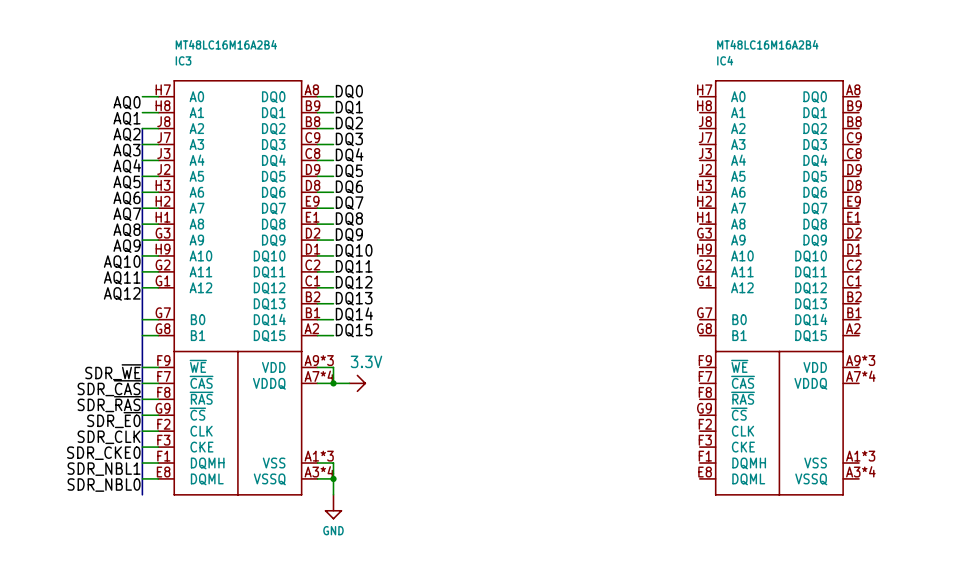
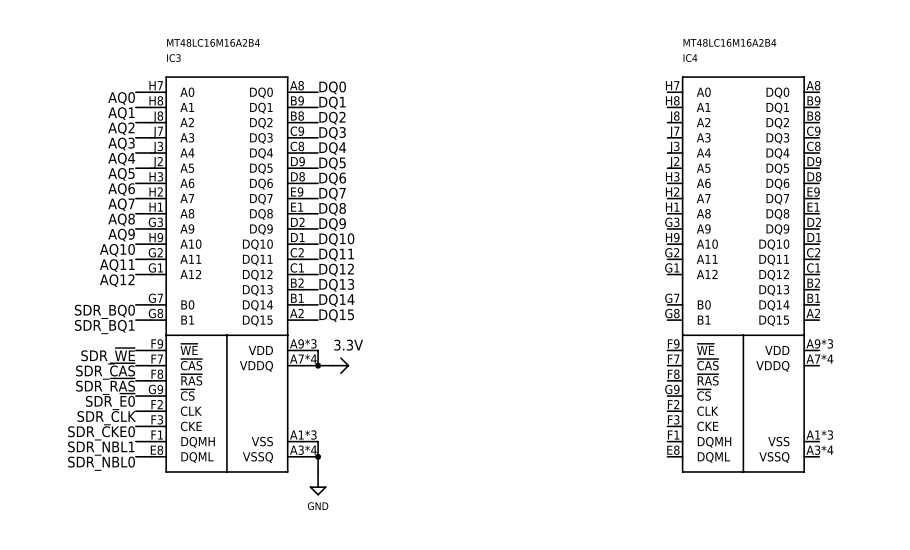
bus: (142, 128) (142, 494) -> none
label: none -> SDR_BQ0 (104, 311)
label: none -> SDR_BQ1 (104, 327)

